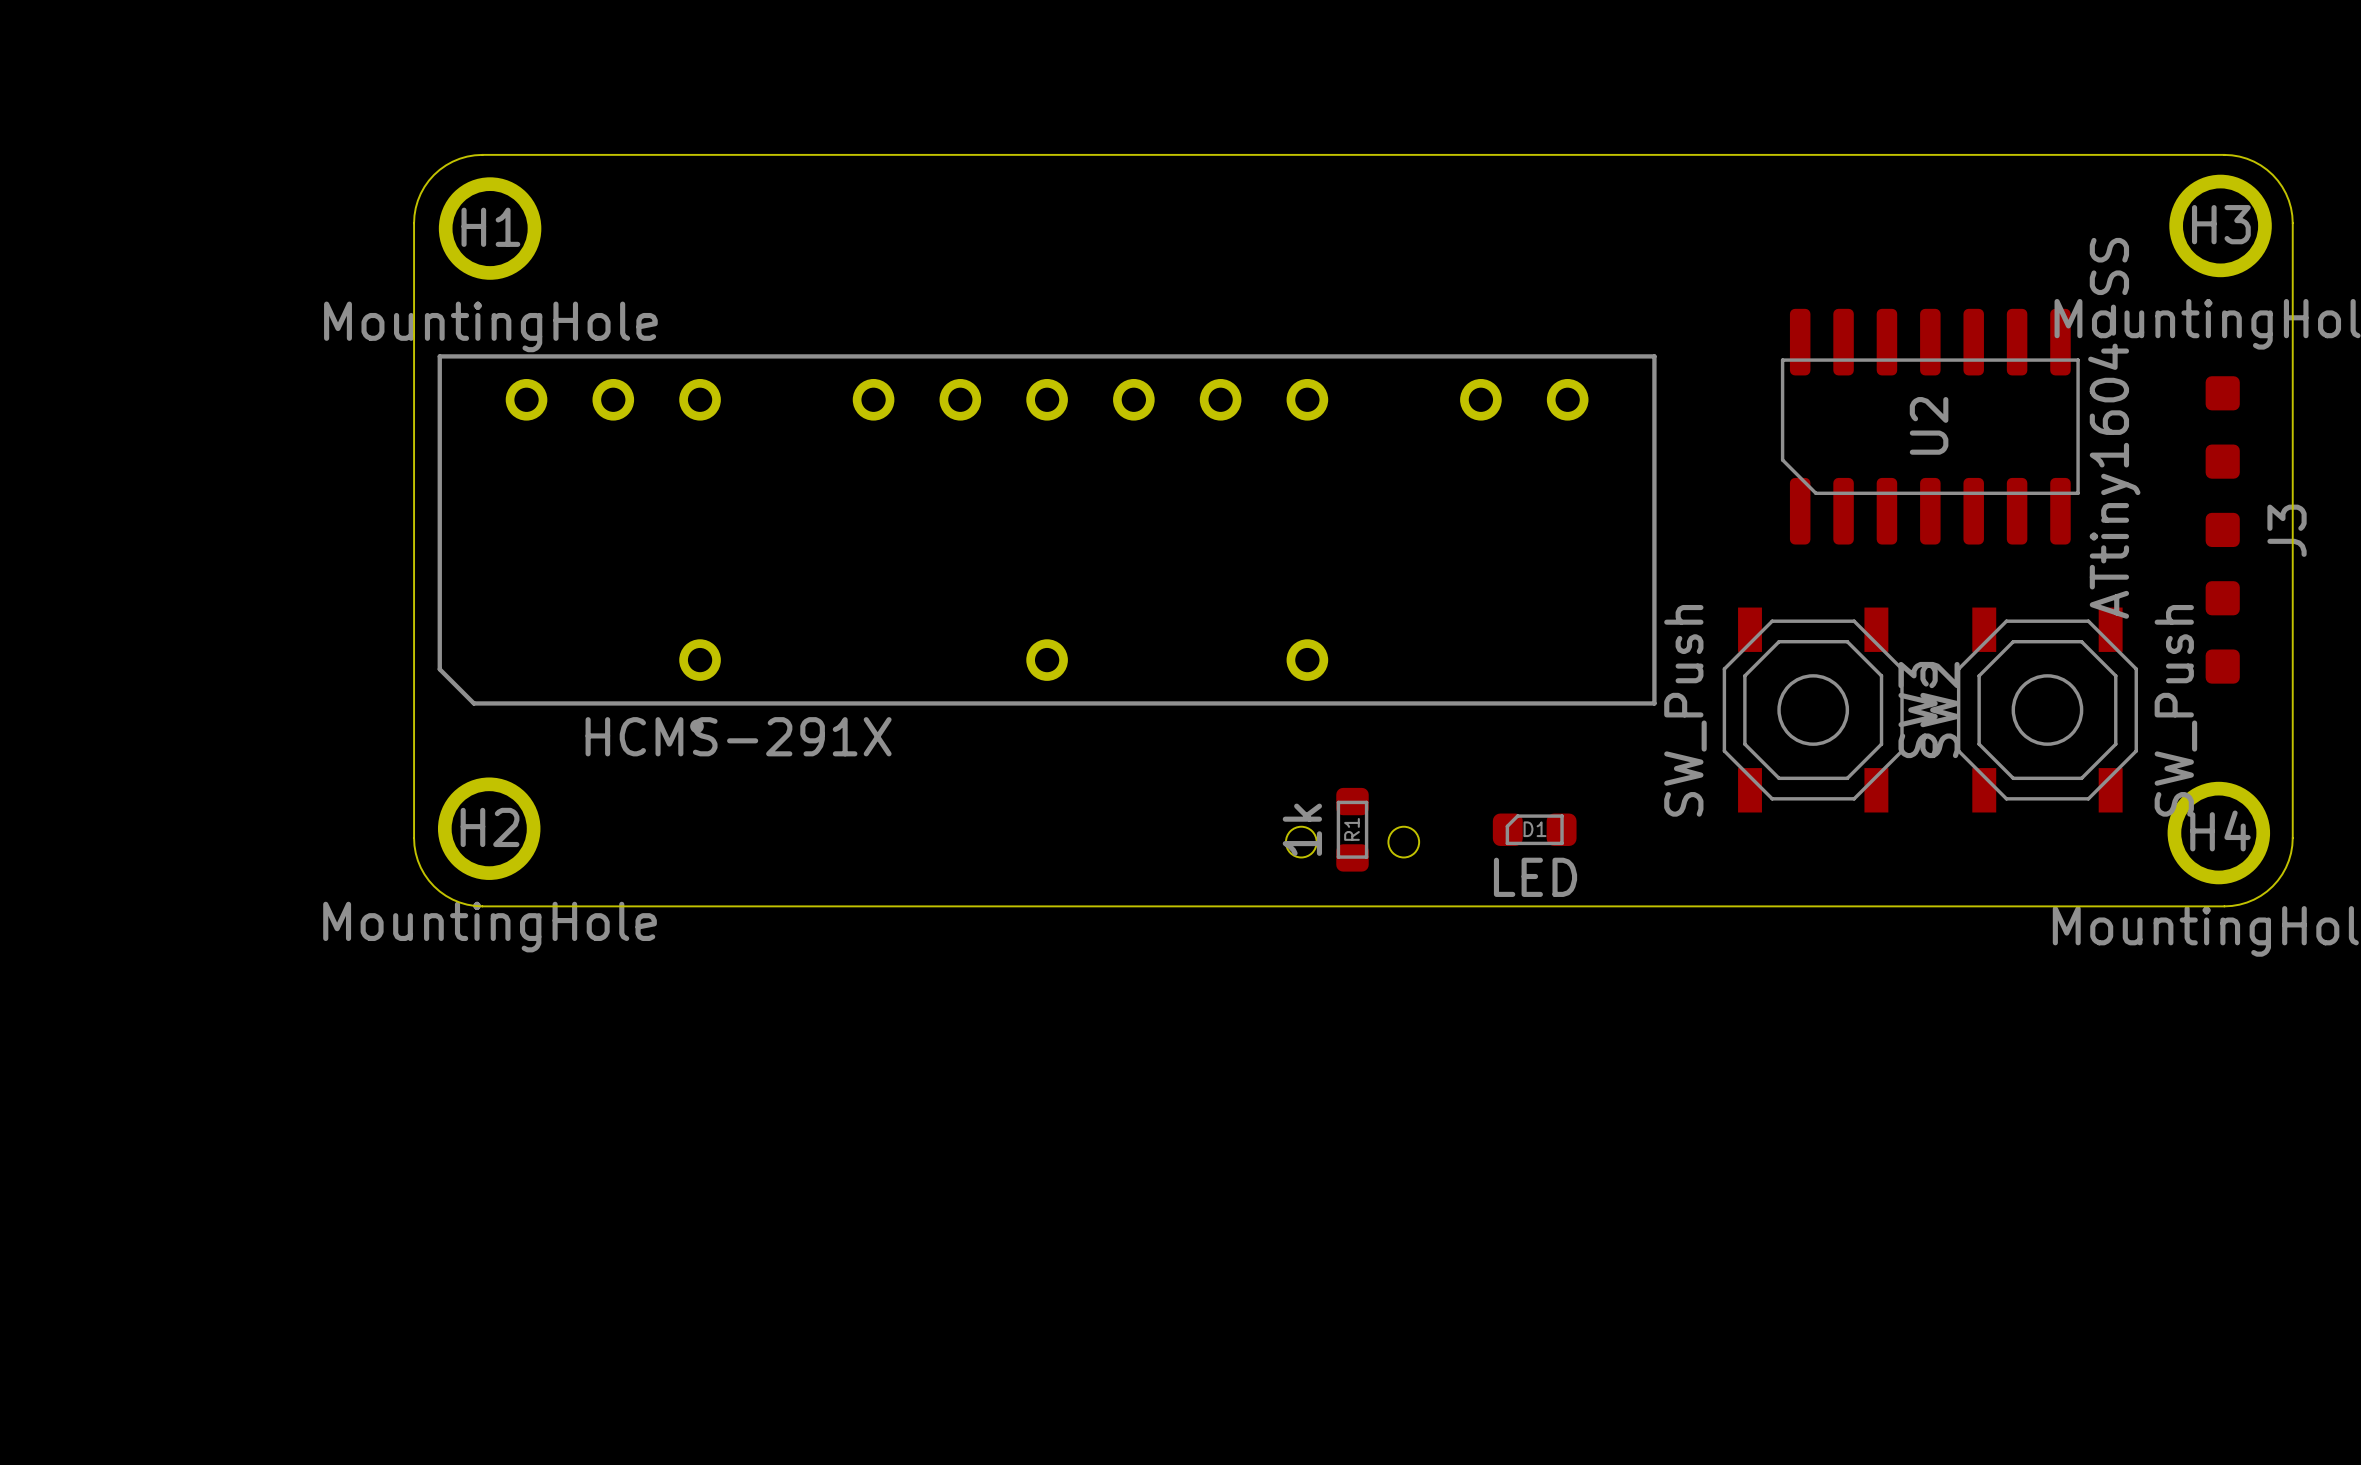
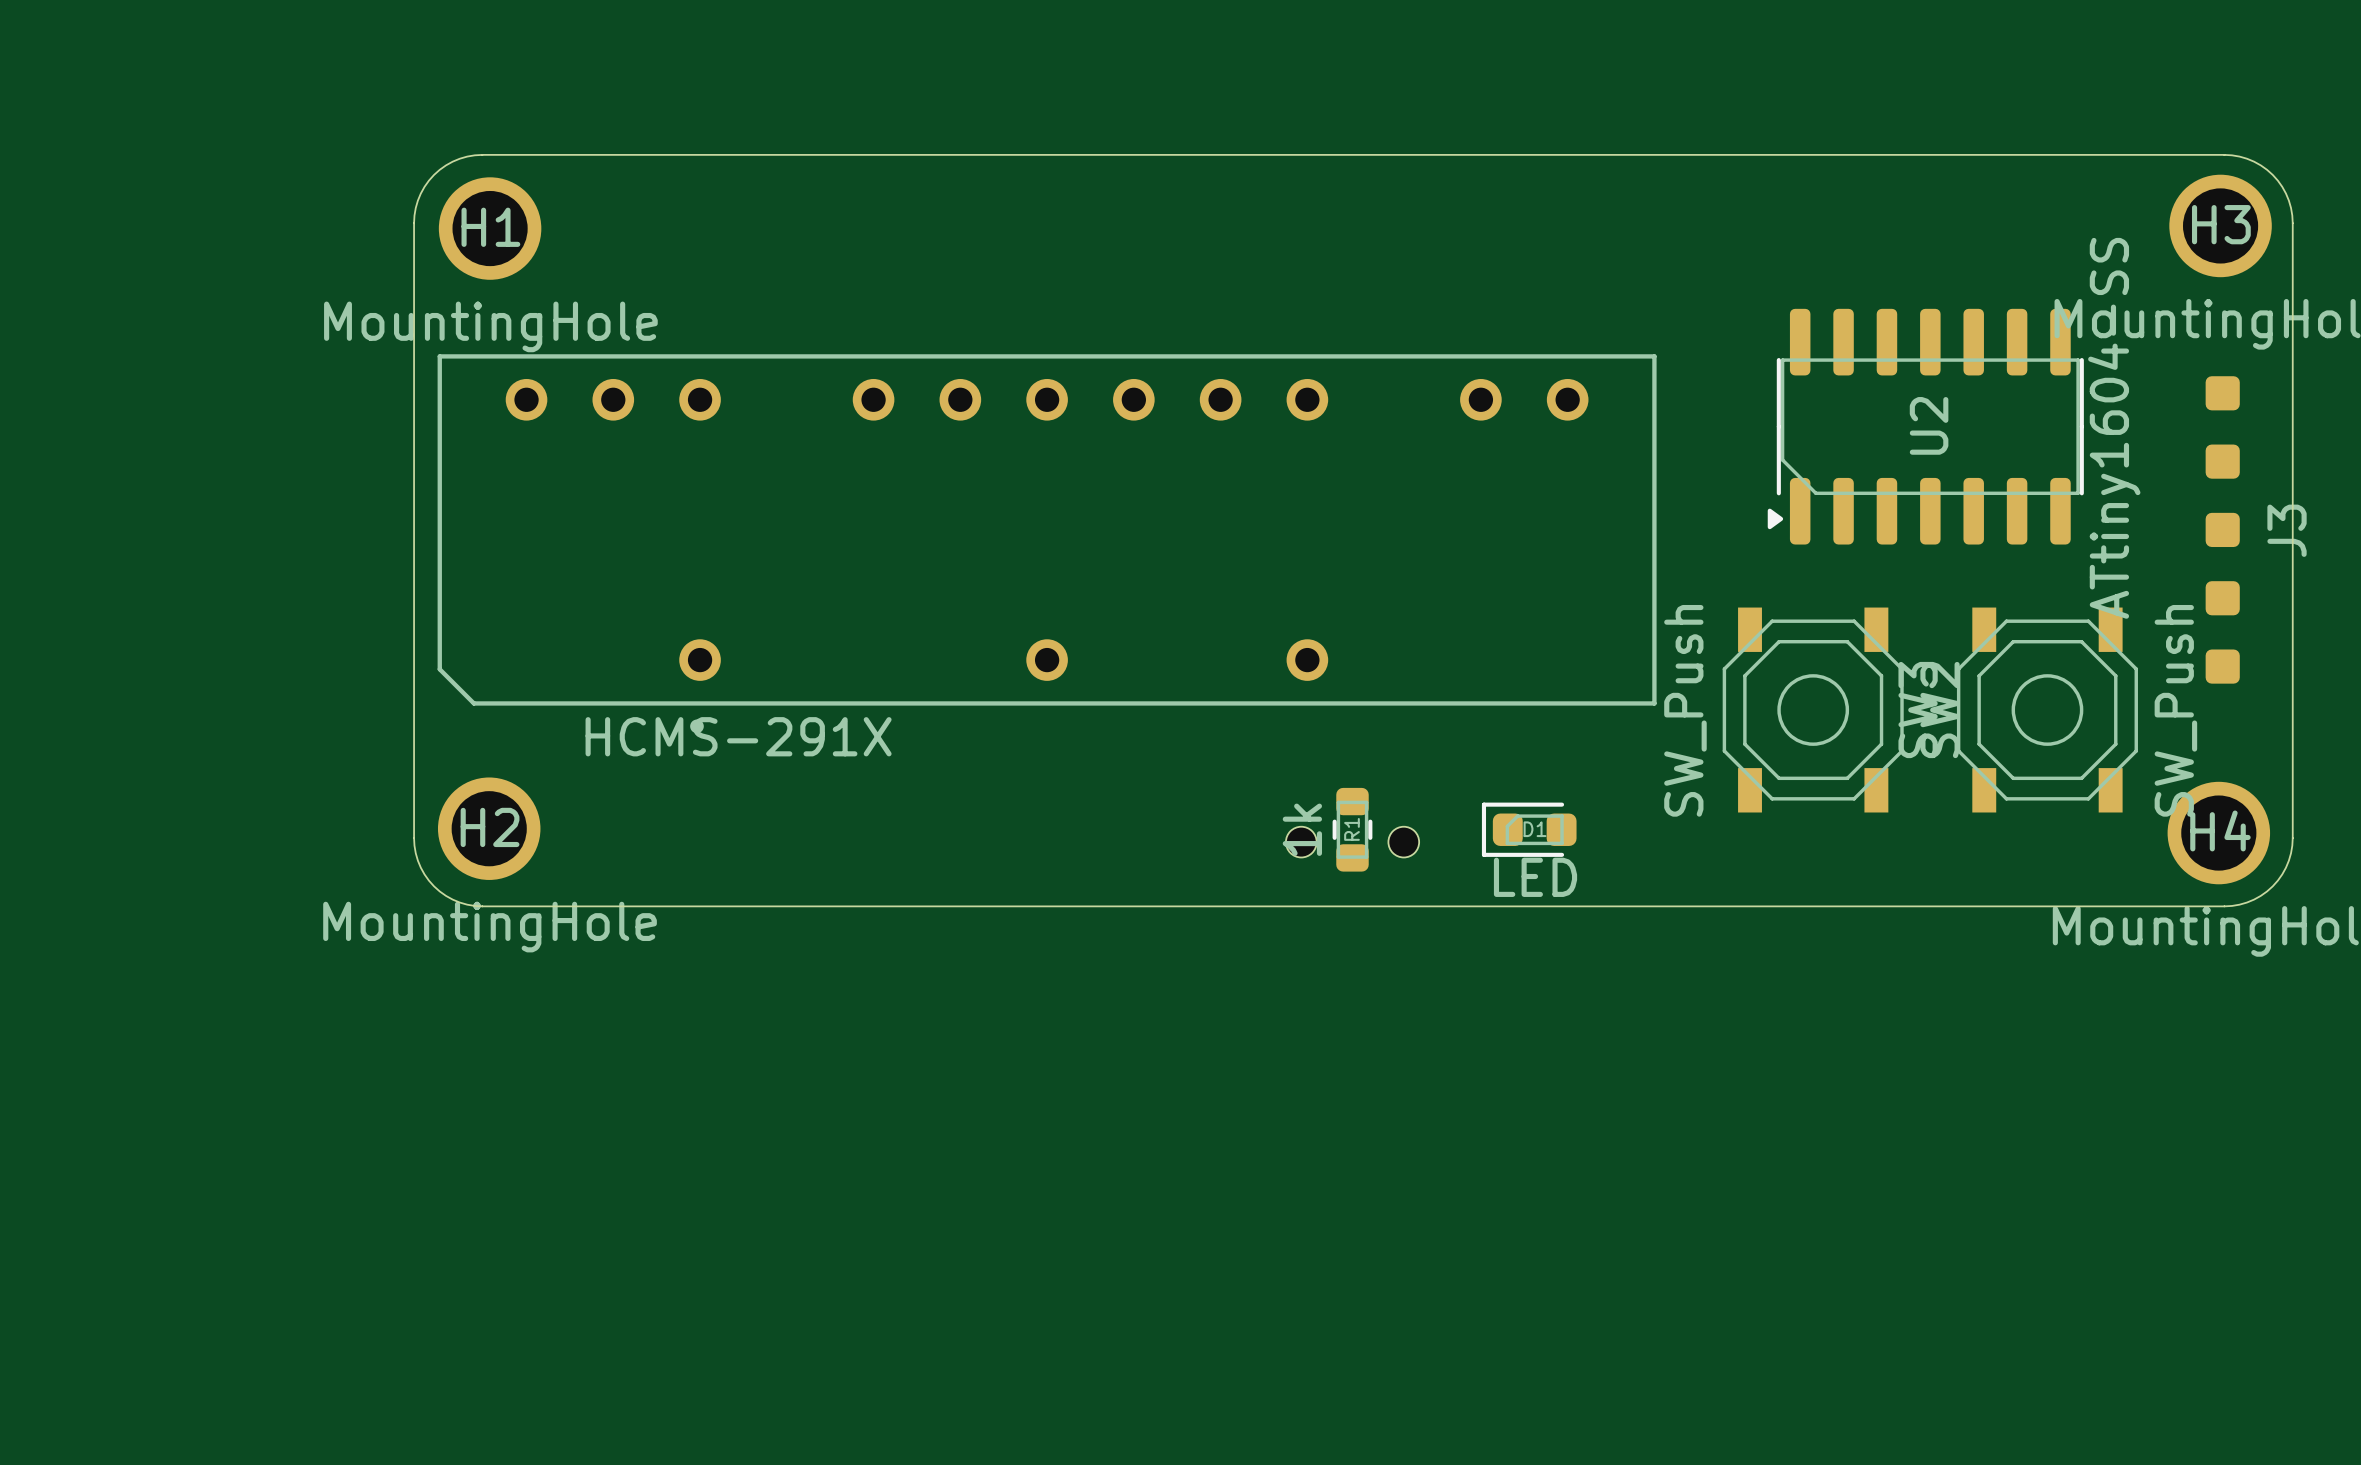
U2 footprint: [1780, 308, 2080, 545] -> [1767, 308, 2084, 545]
R1 footprint: [1336, 787, 1369, 872] -> [1332, 787, 1373, 872]
D1 footprint: [1492, 813, 1577, 846] -> [1481, 802, 1577, 857]

